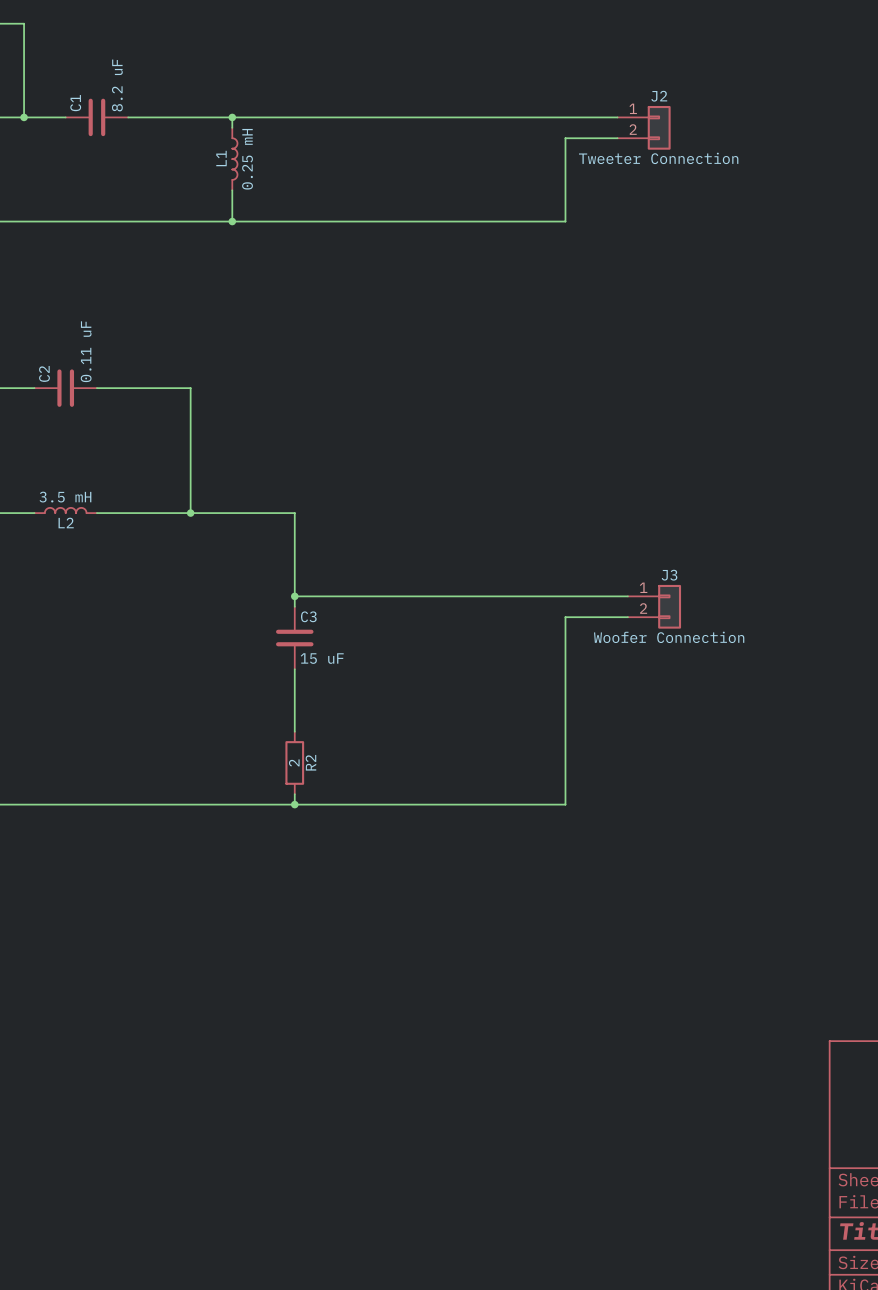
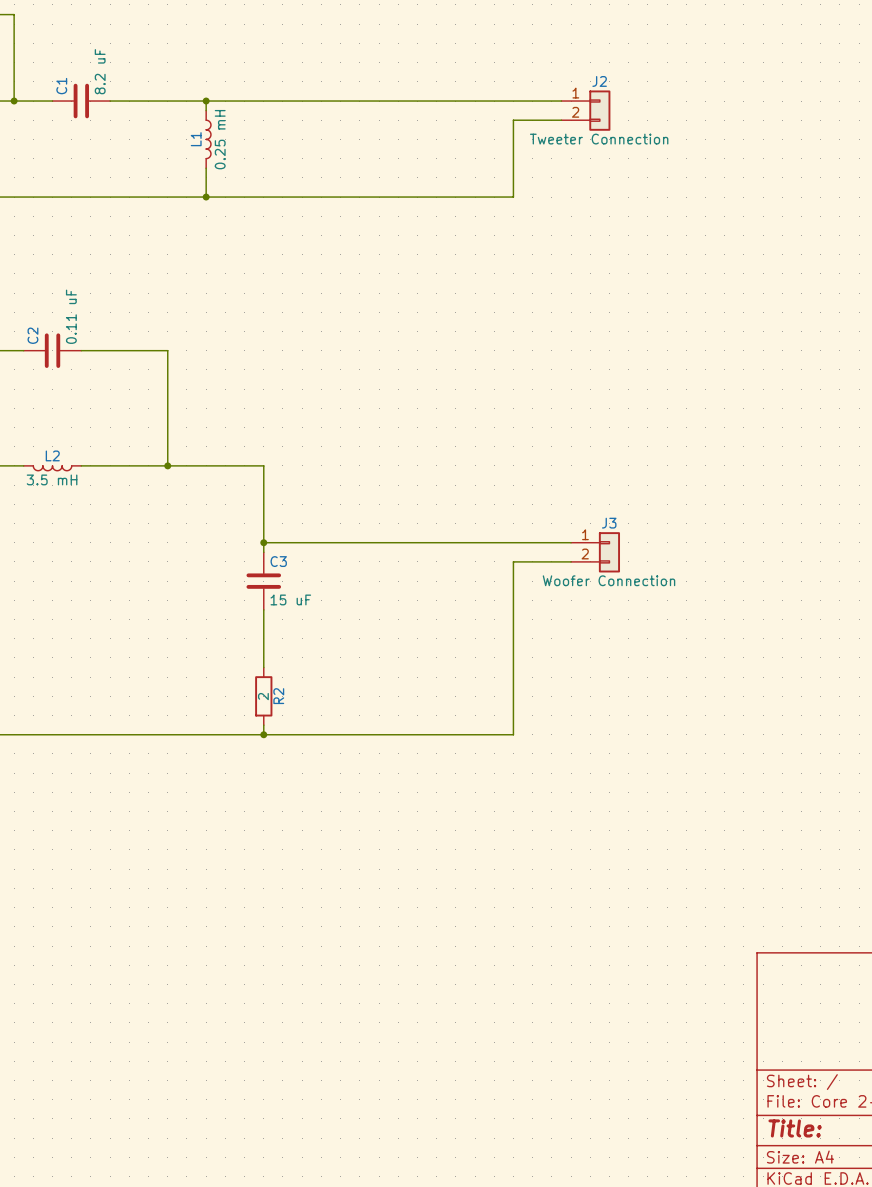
L2 rotation: 0° (65, 510) -> 180° (52, 468)

